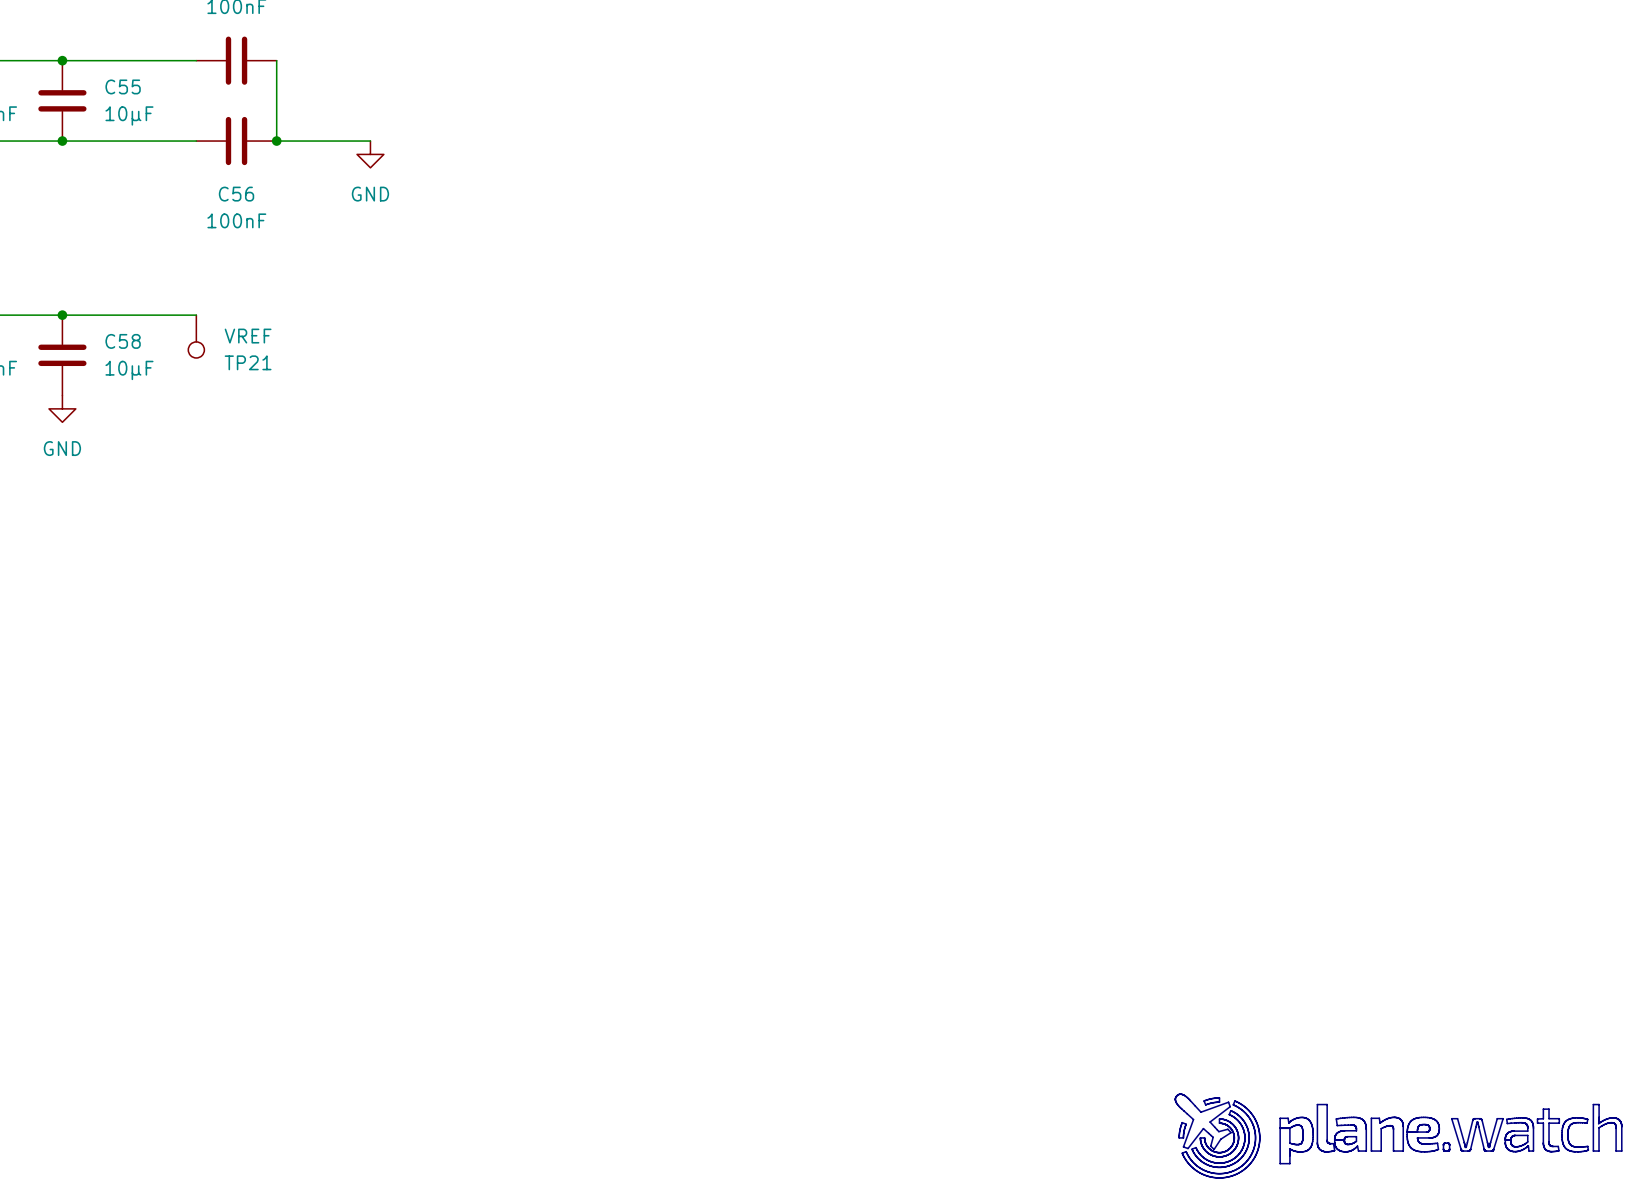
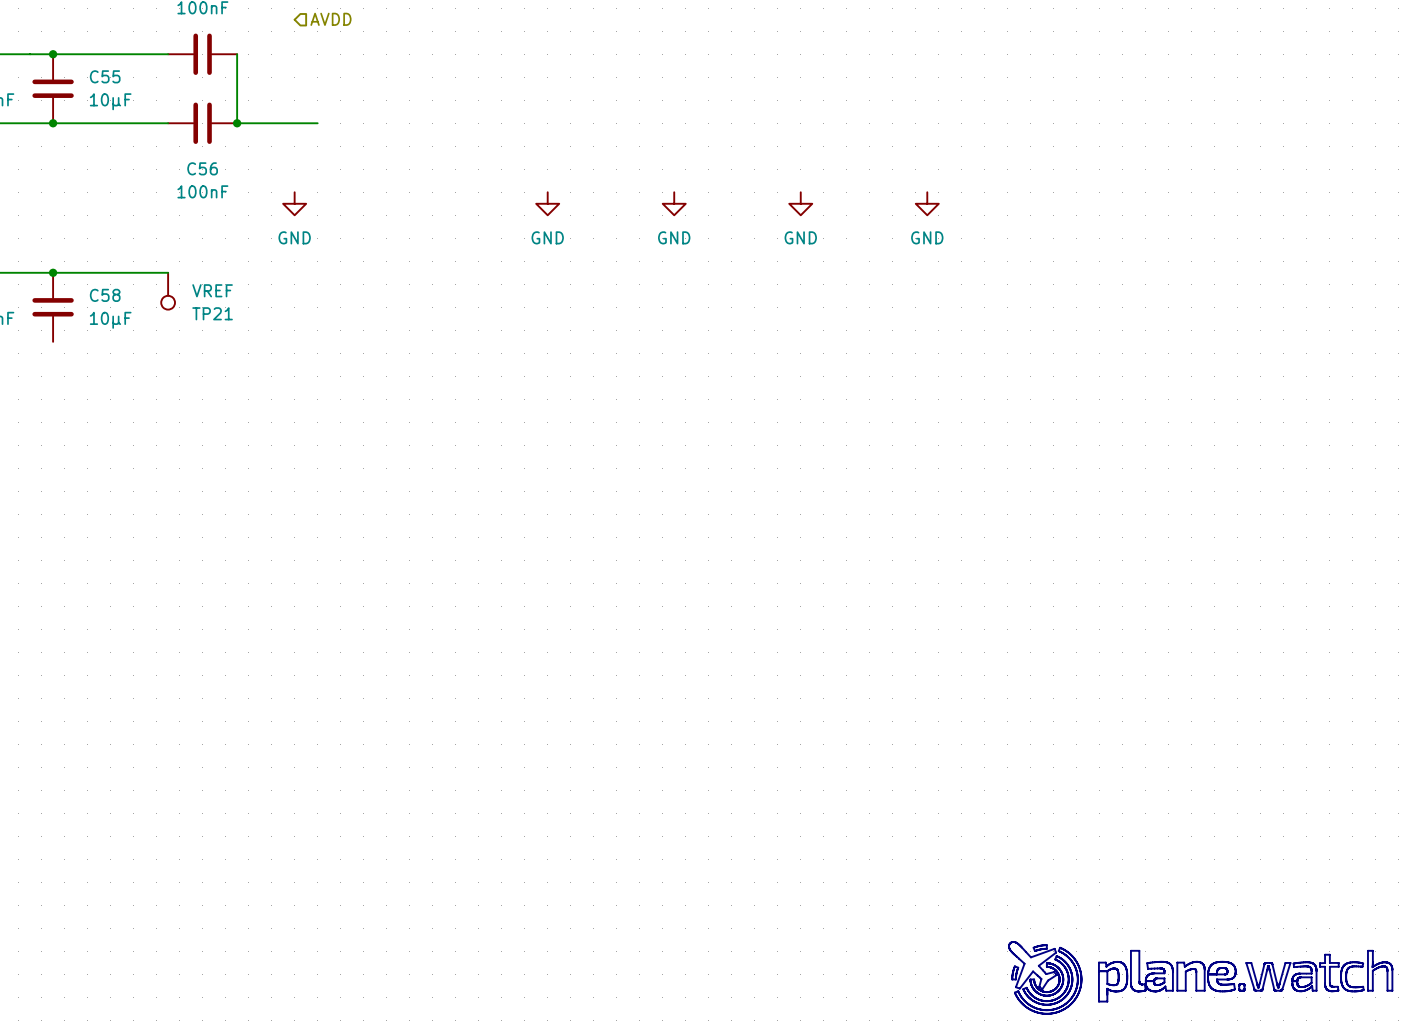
hierarchical label: none -> AVDD (330, 19)
power symbol position: GND (370, 154) -> GND (294, 203)
power symbol: none -> GND (547, 203)
power symbol: none -> GND (674, 203)
power symbol: none -> GND (800, 203)
power symbol: none -> GND (927, 203)
power symbol: GND (62, 408) -> none

